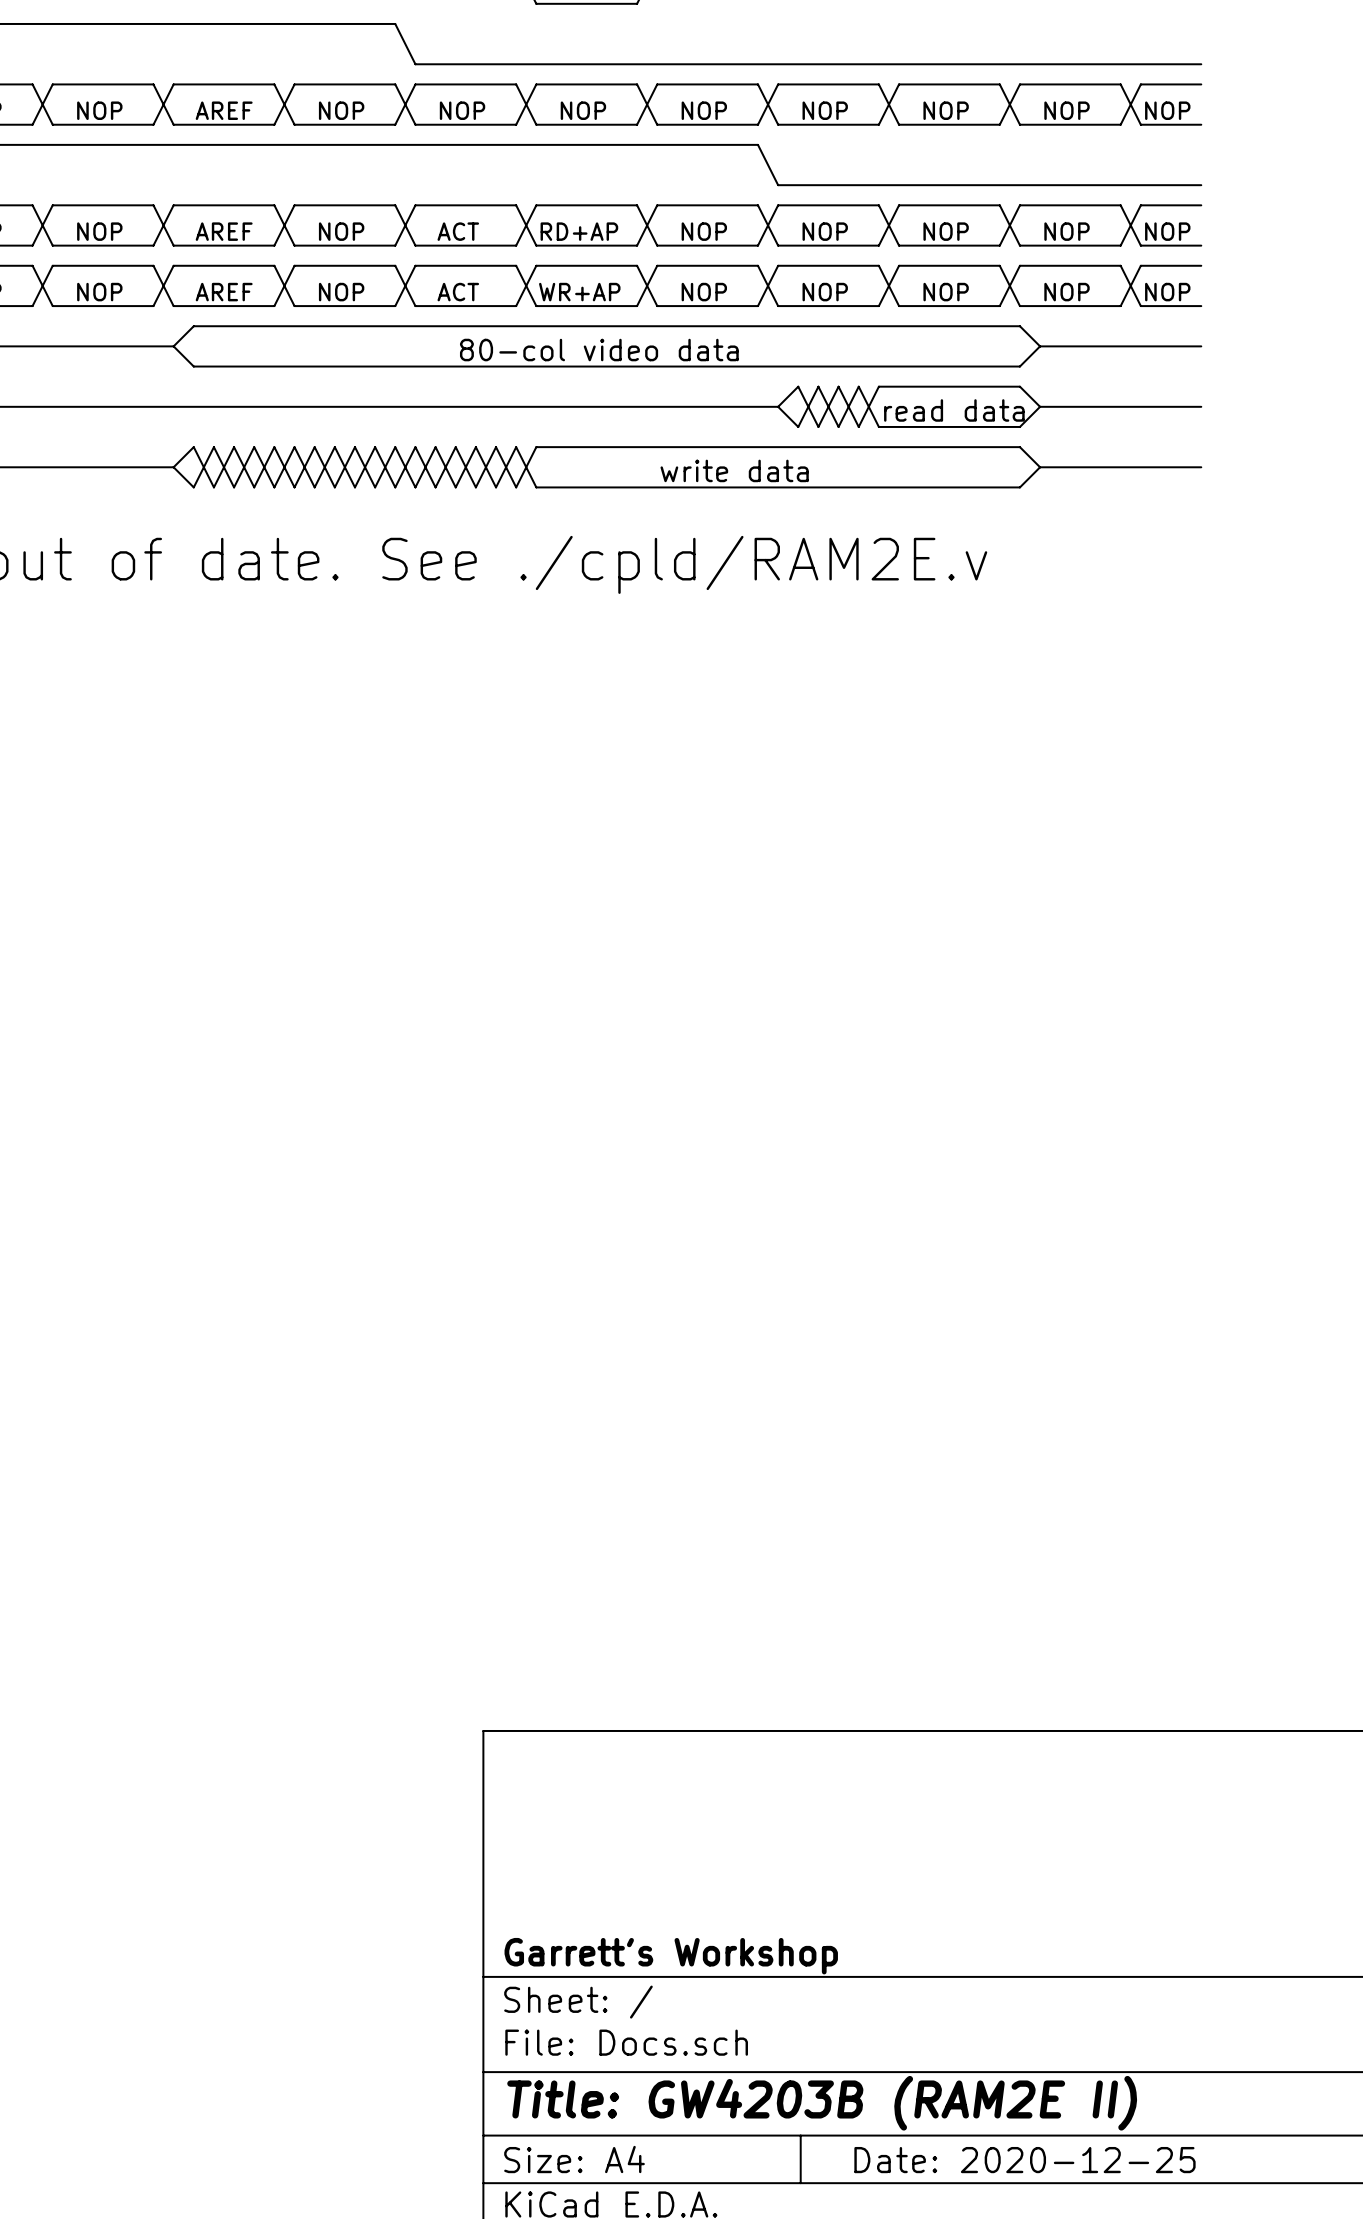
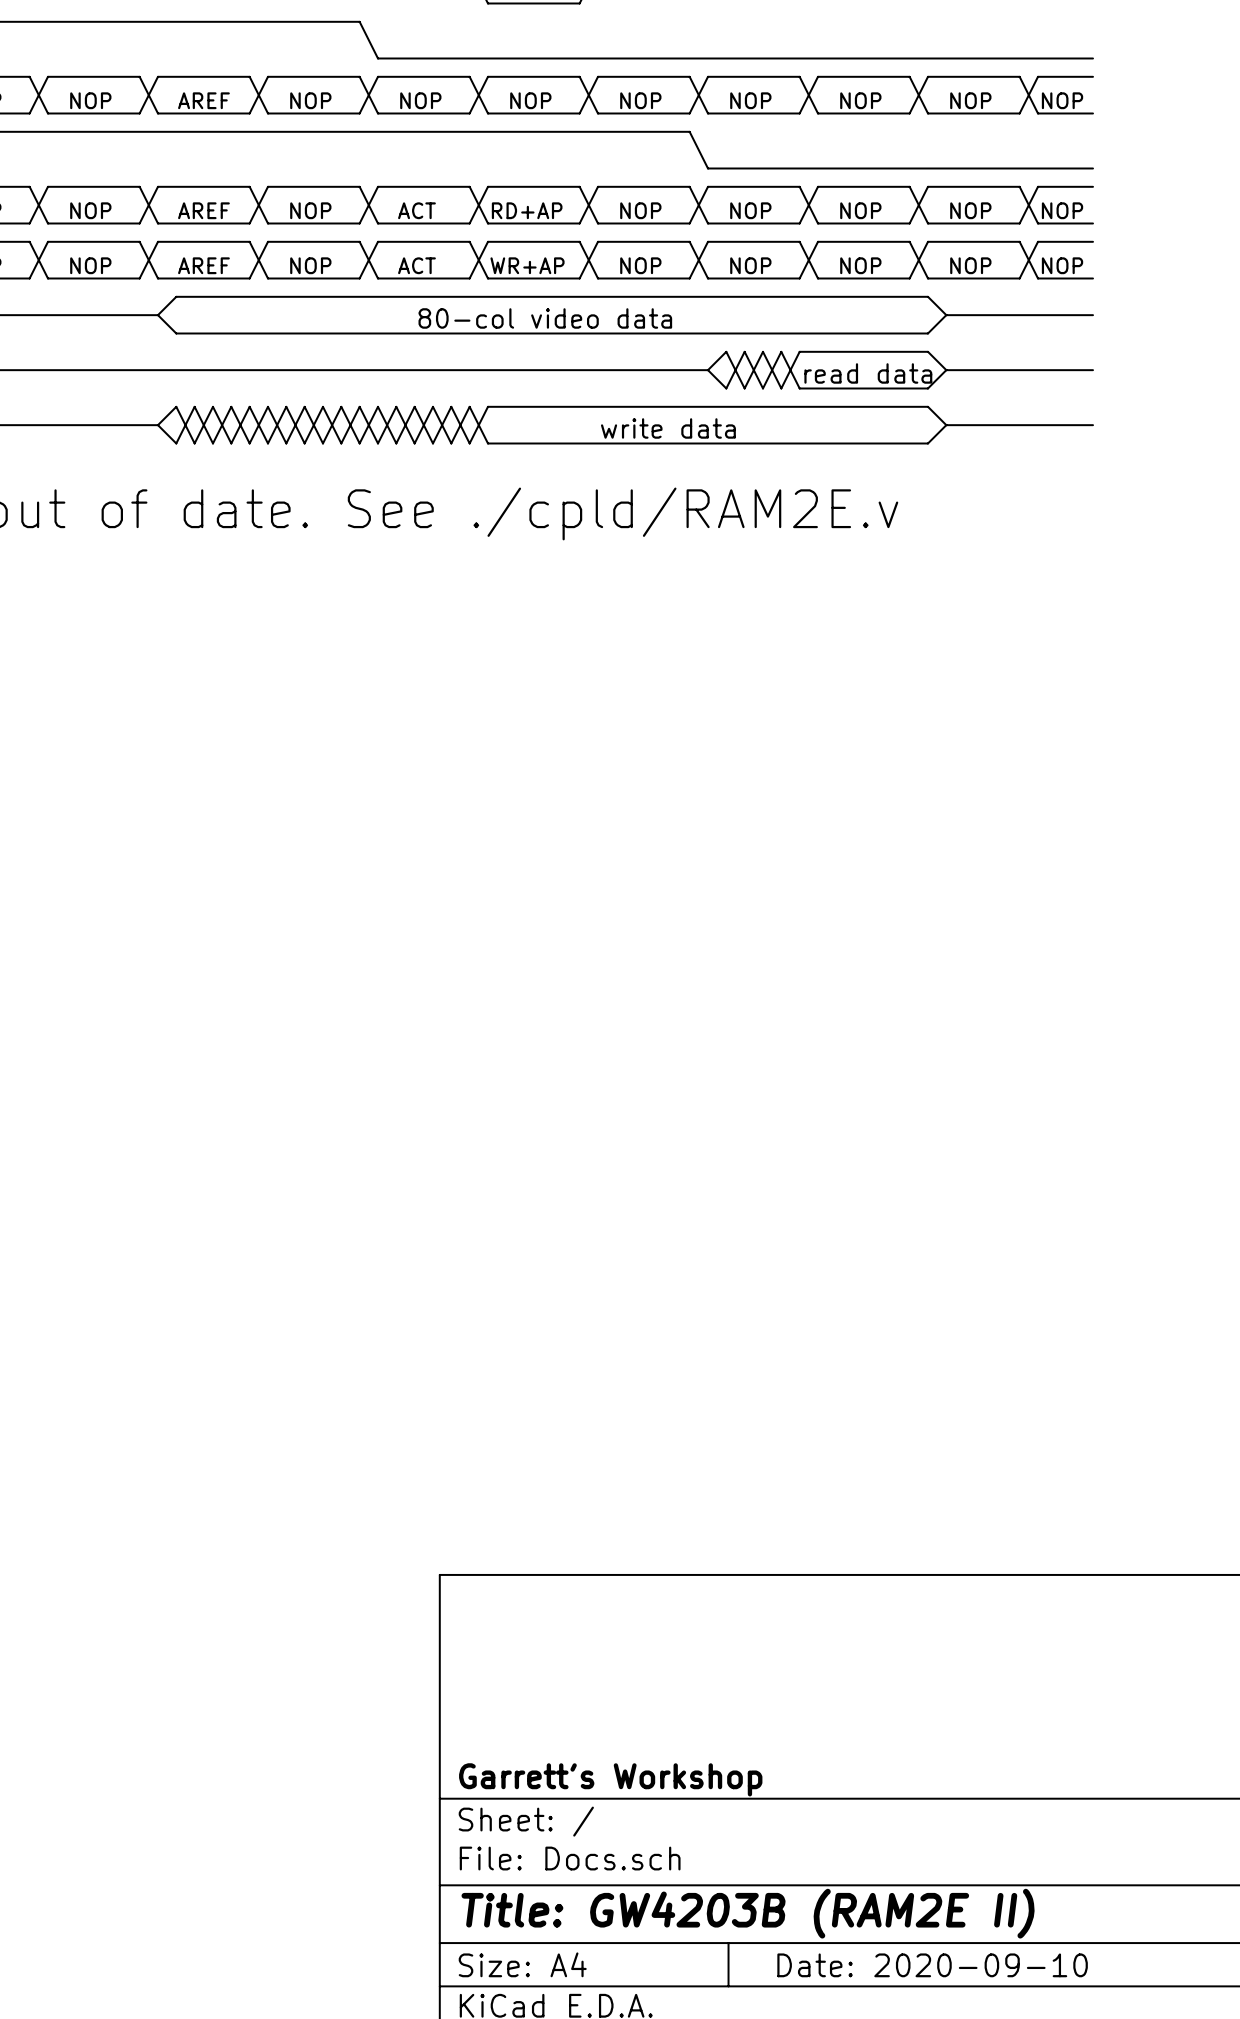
title block: Date: 2020-12-25 (1024, 2160) -> Date: 2020-09-10 (932, 1965)

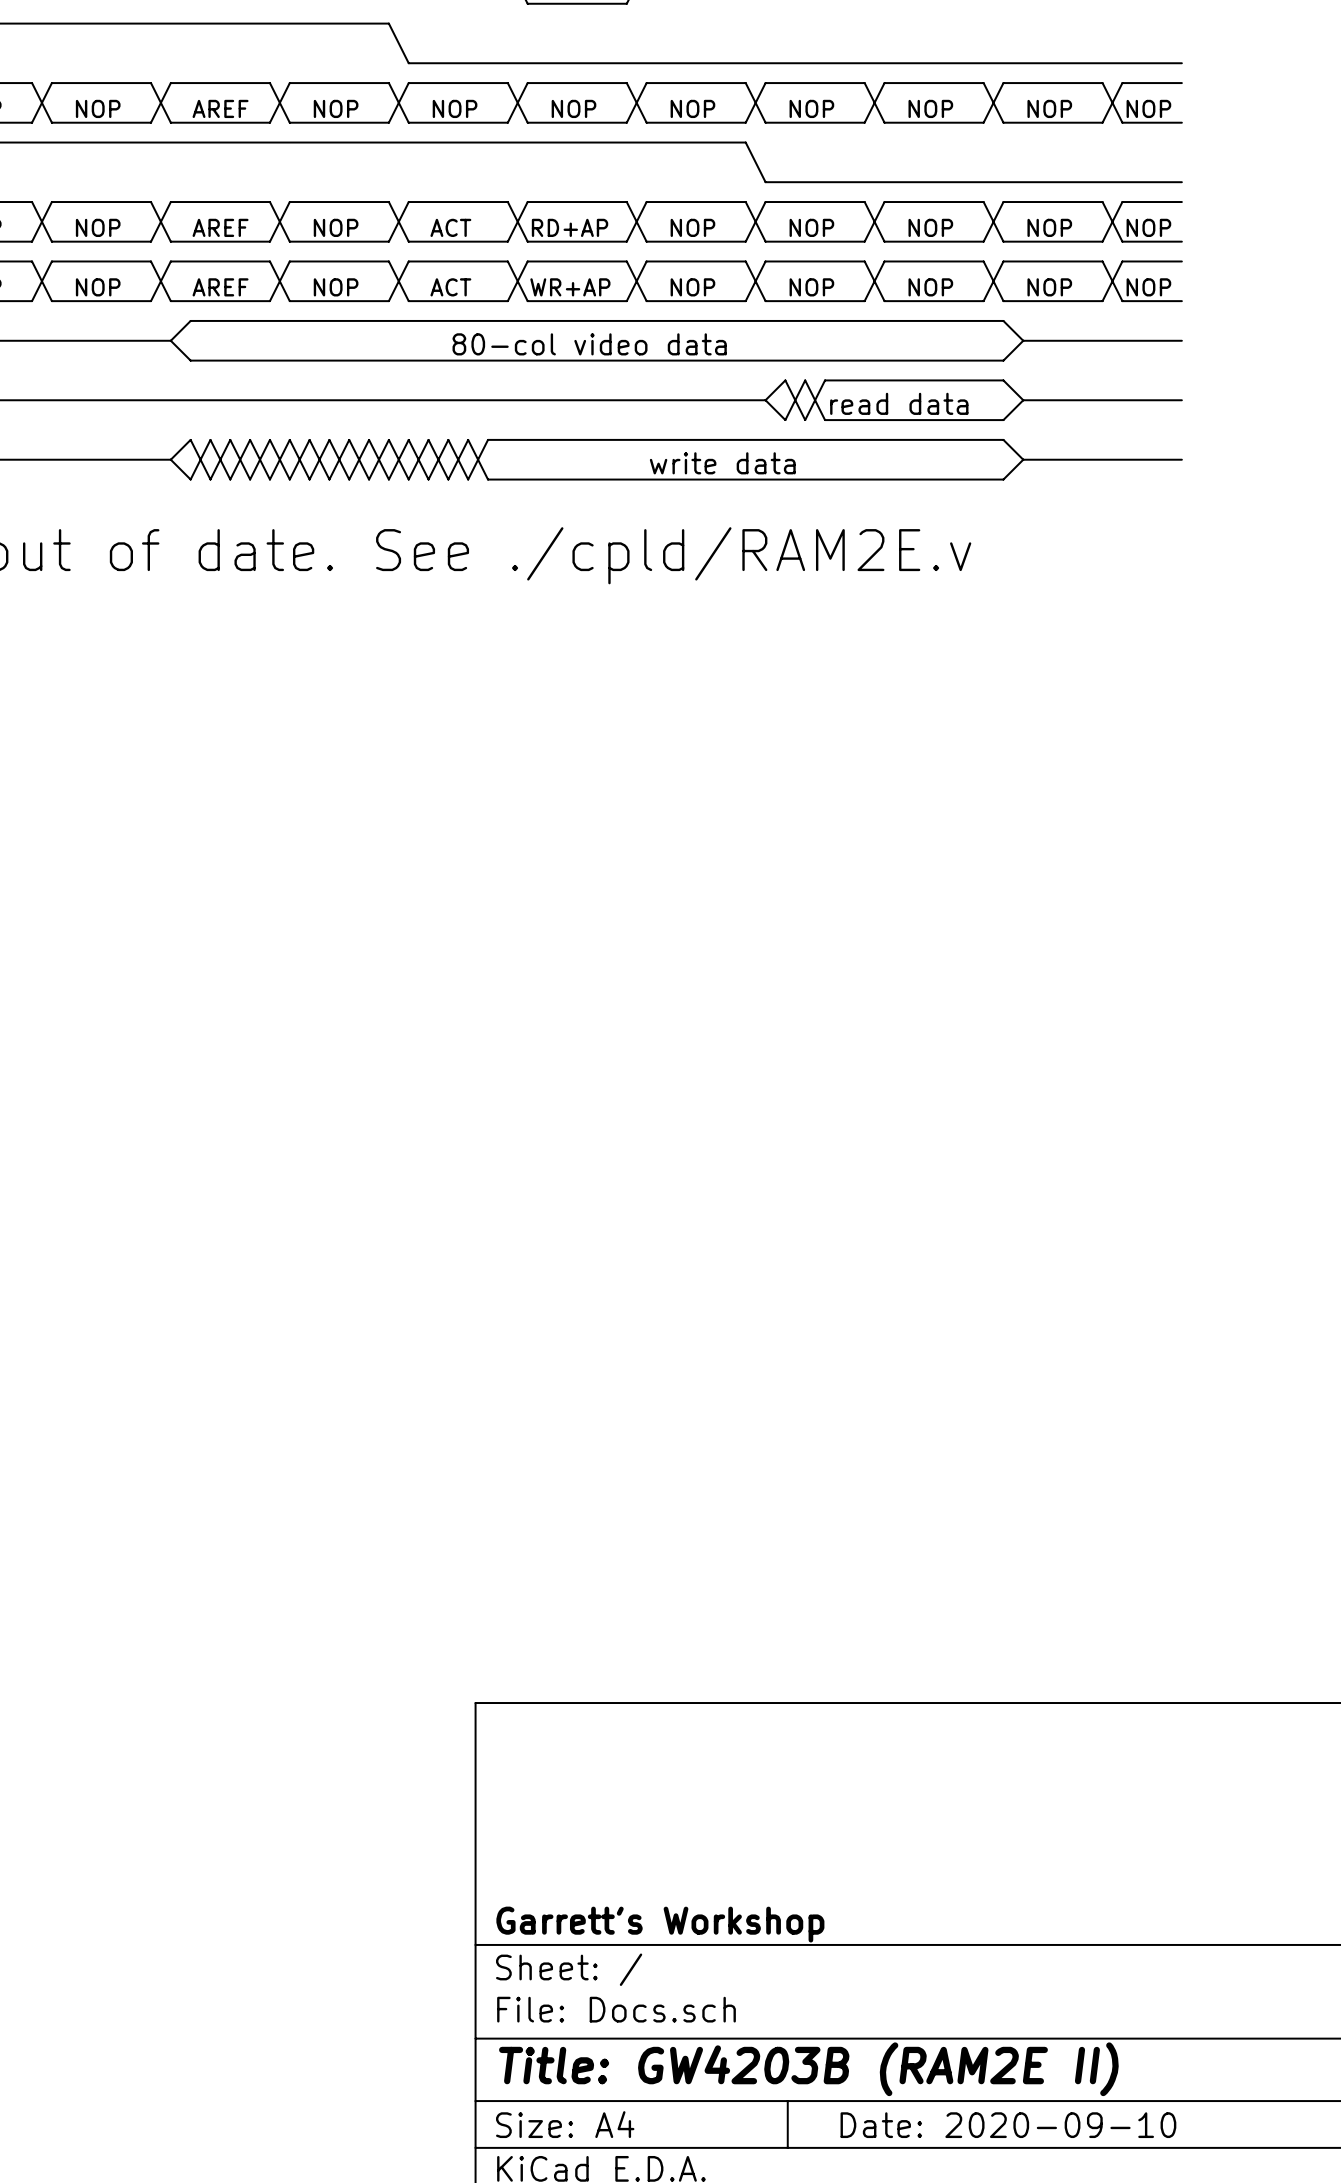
wire: (763, 351) (781, 388) (799, 351) -> (825, 380) (864, 380)
text position: read data (868, 373) -> read data (899, 403)
wire: (763, 388) (781, 351) (799, 388) -> (825, 420) (864, 420)
wire: (451, 406) (469, 443) (487, 406) -> (488, 439) (527, 439)
wire: (451, 443) (469, 406) (487, 443) -> (488, 479) (527, 479)

